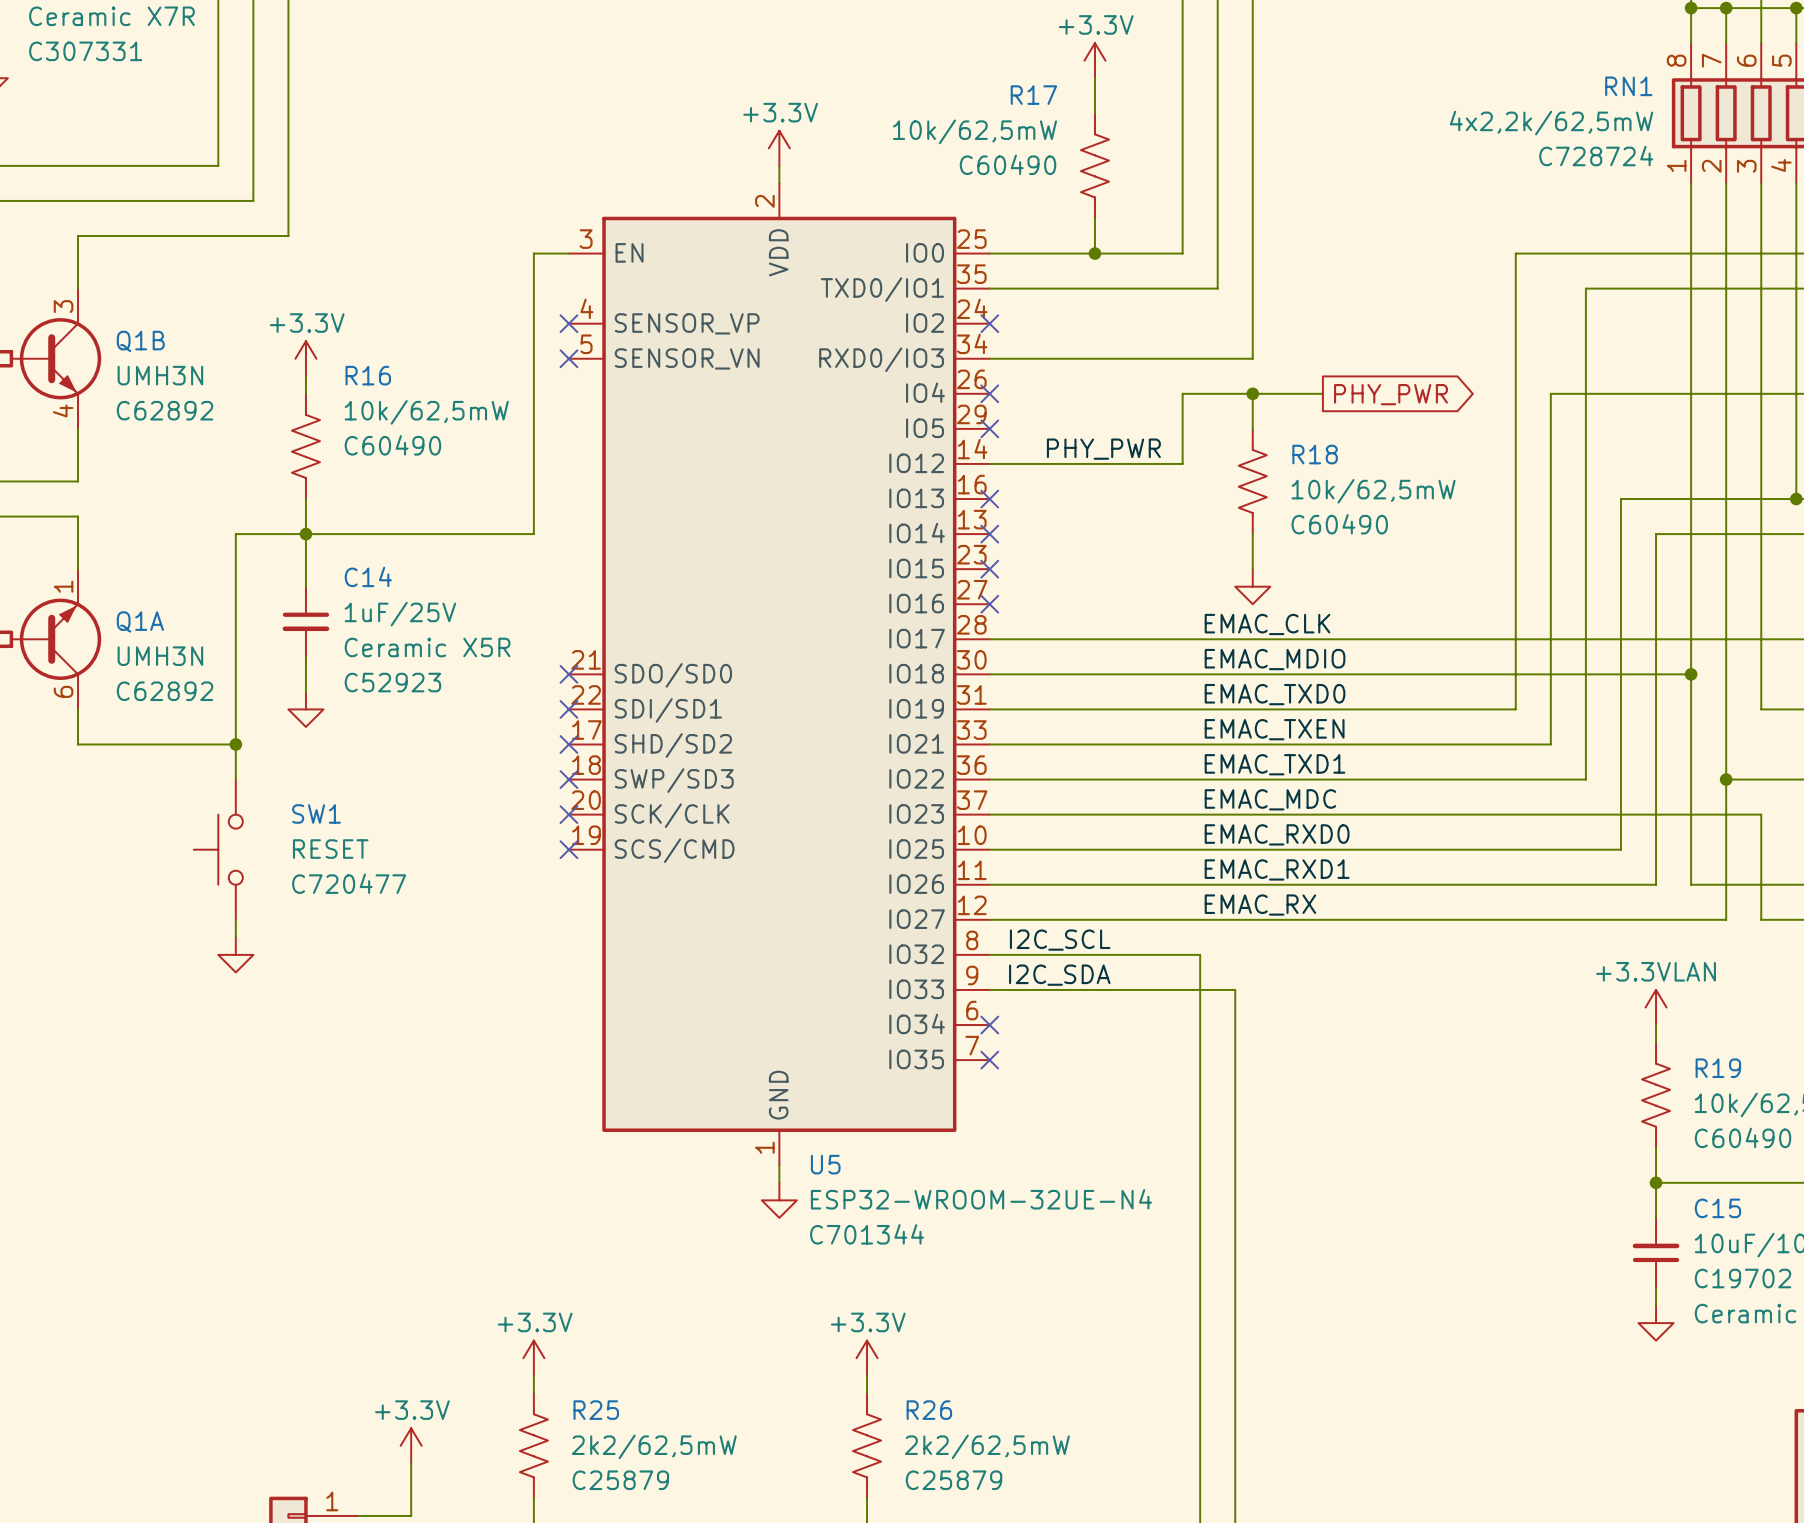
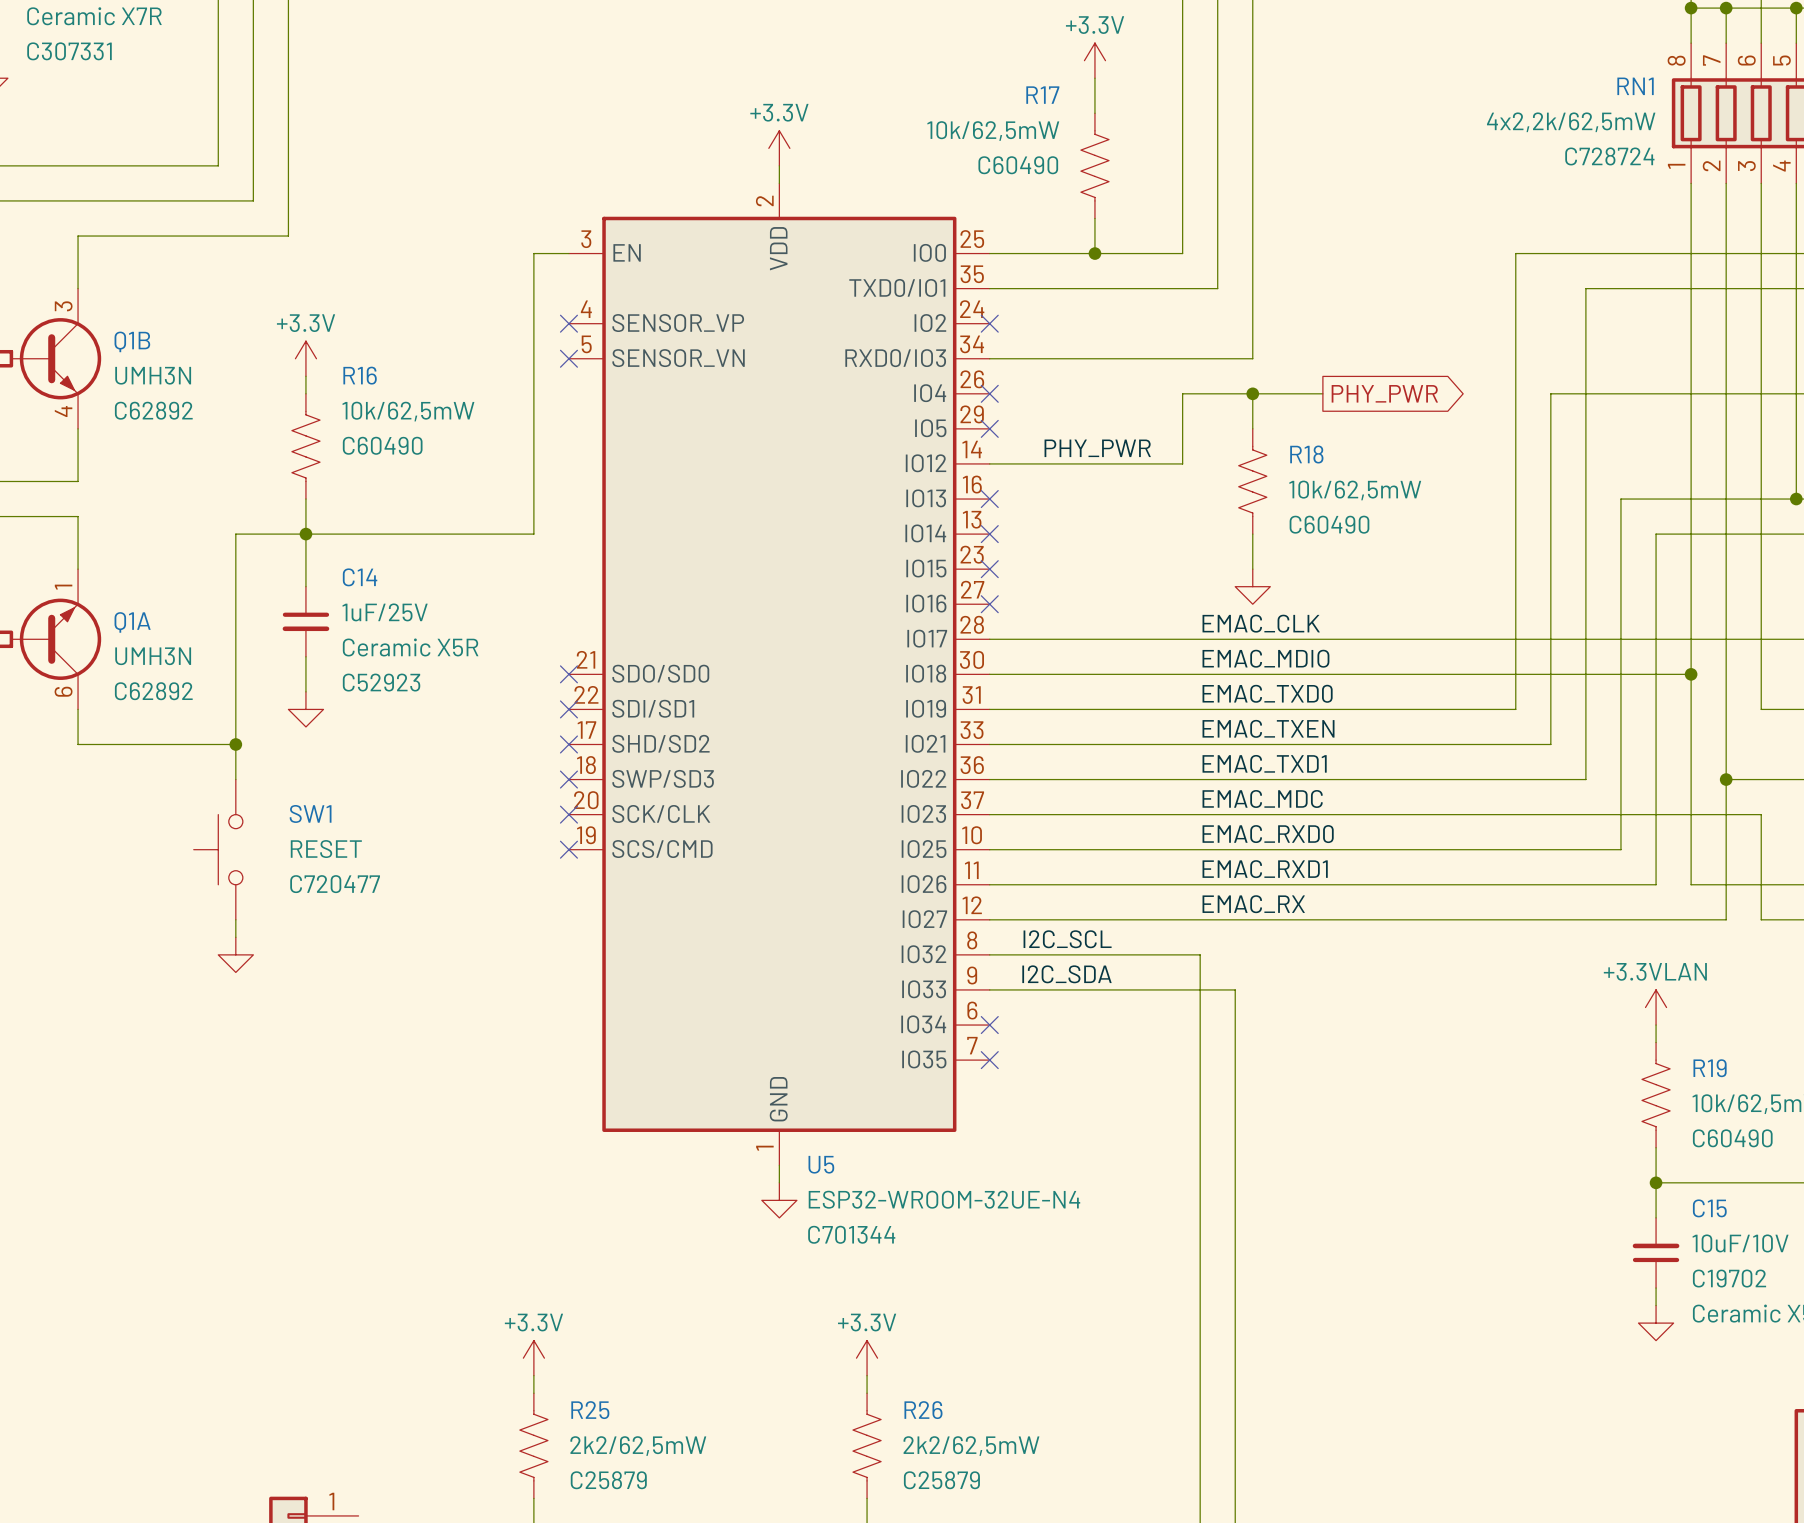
power symbol: +3.3V (411, 1445) -> none
wire: (411, 1463) (411, 1515) (358, 1515) -> none

